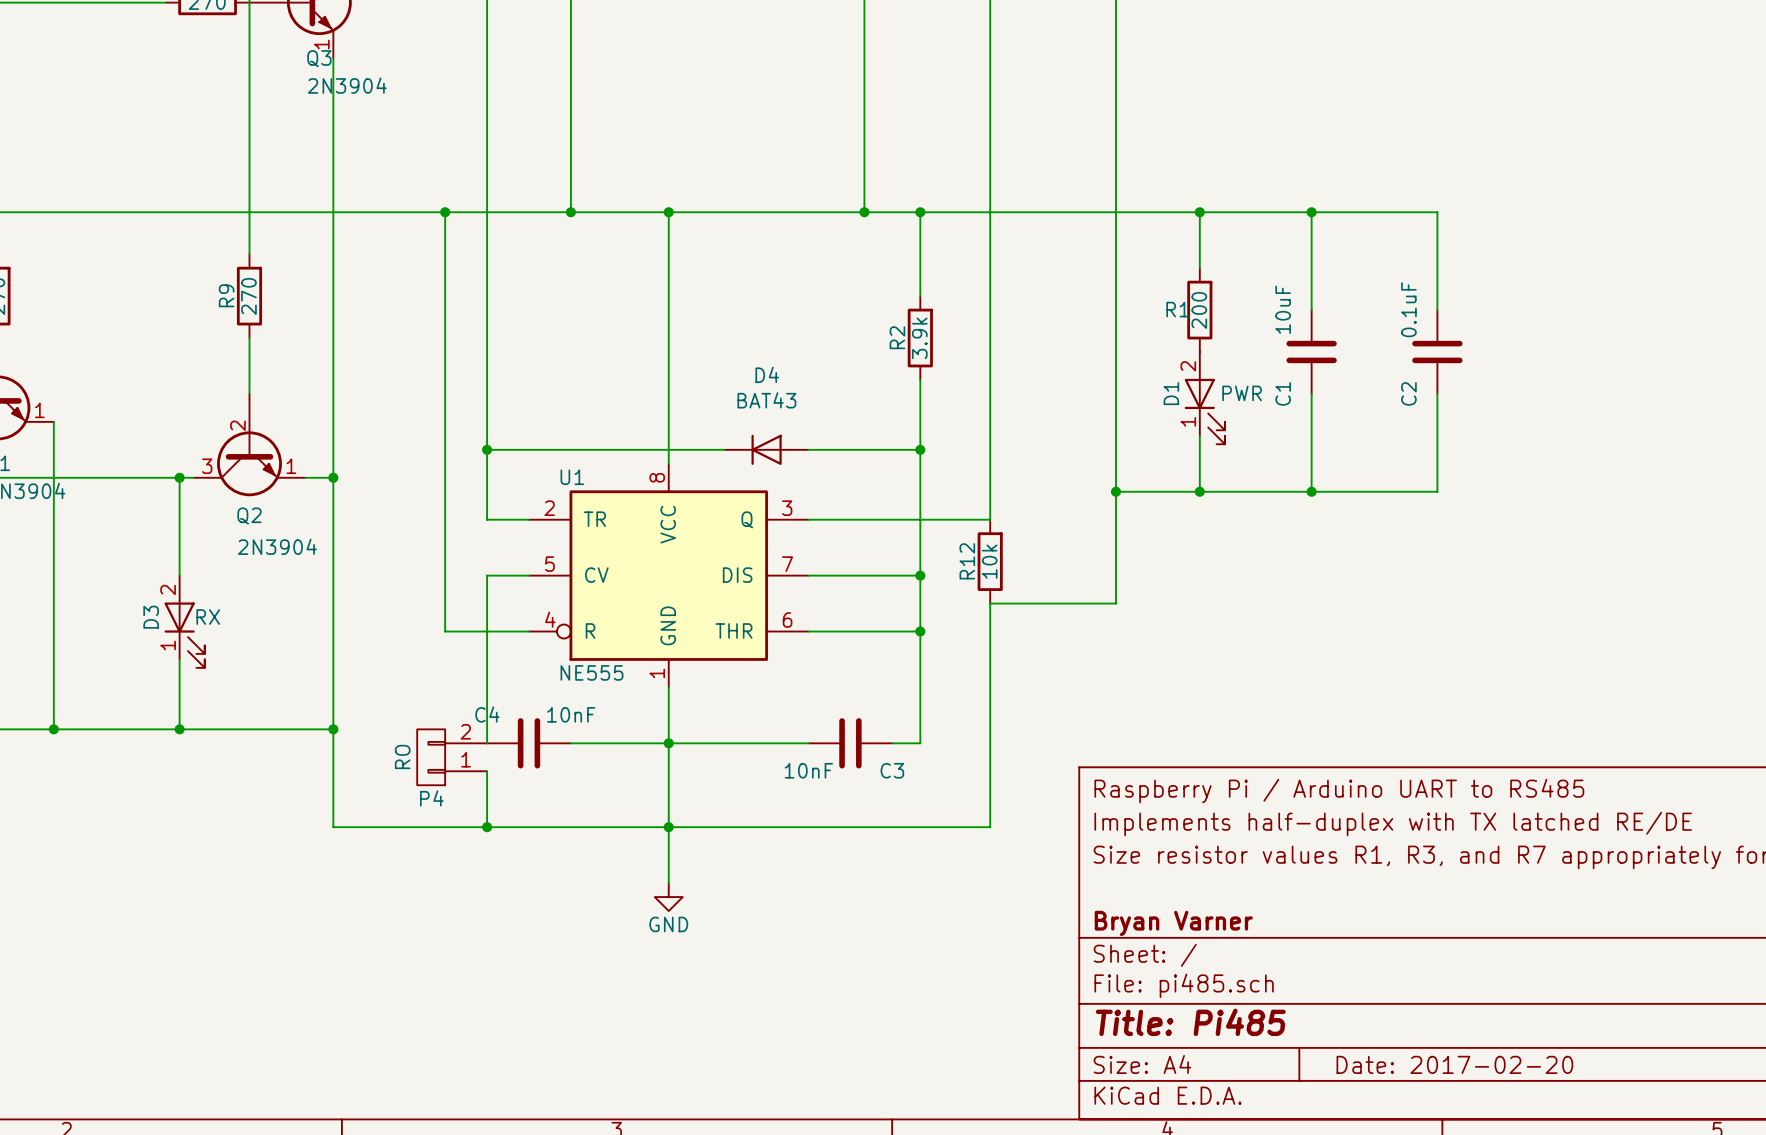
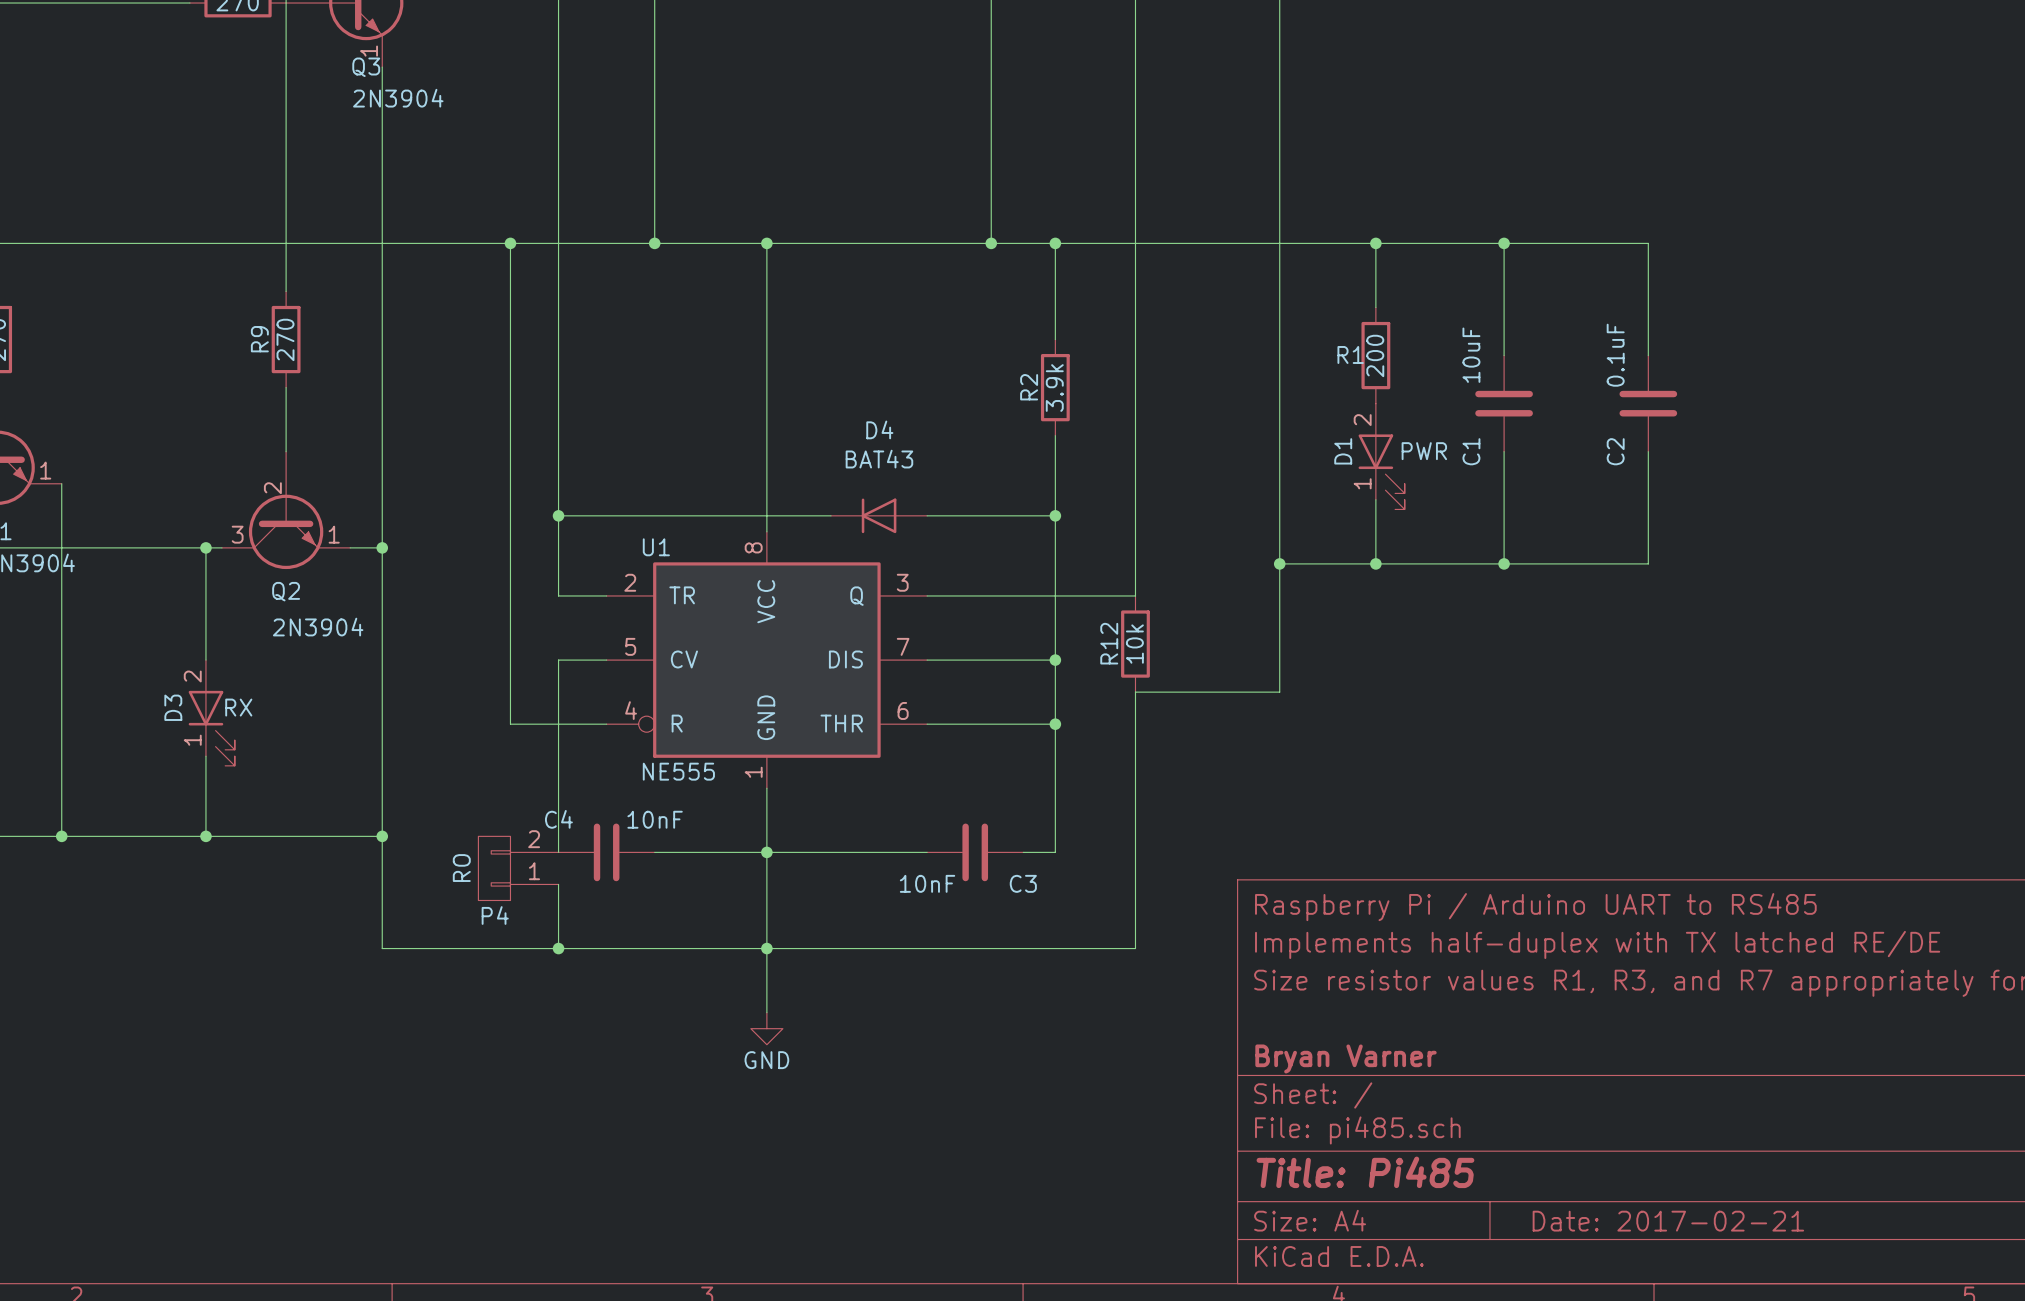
title block: Date: 2017-02-20 (1454, 1064) -> Date: 2017-02-21 (1668, 1221)

